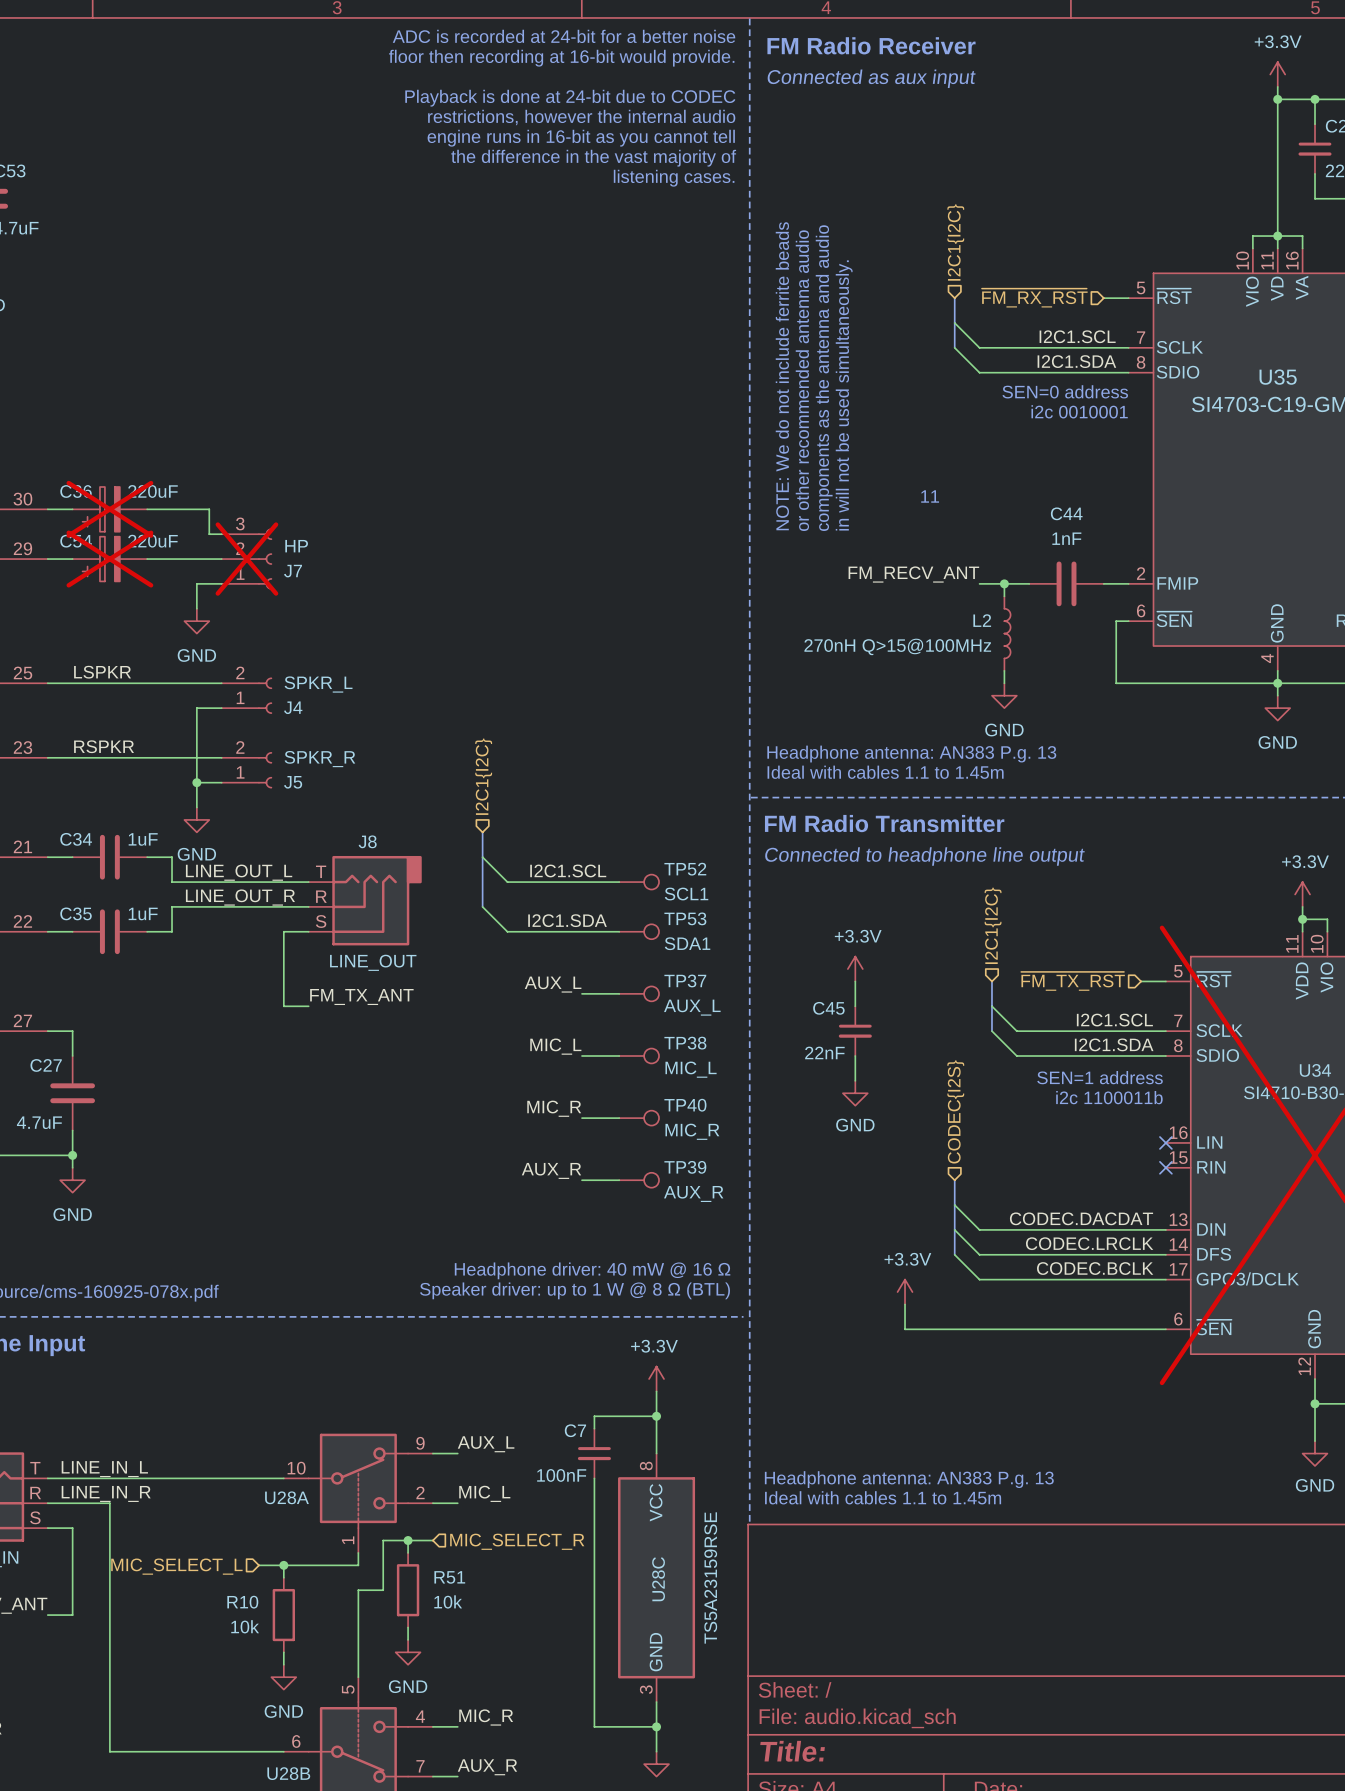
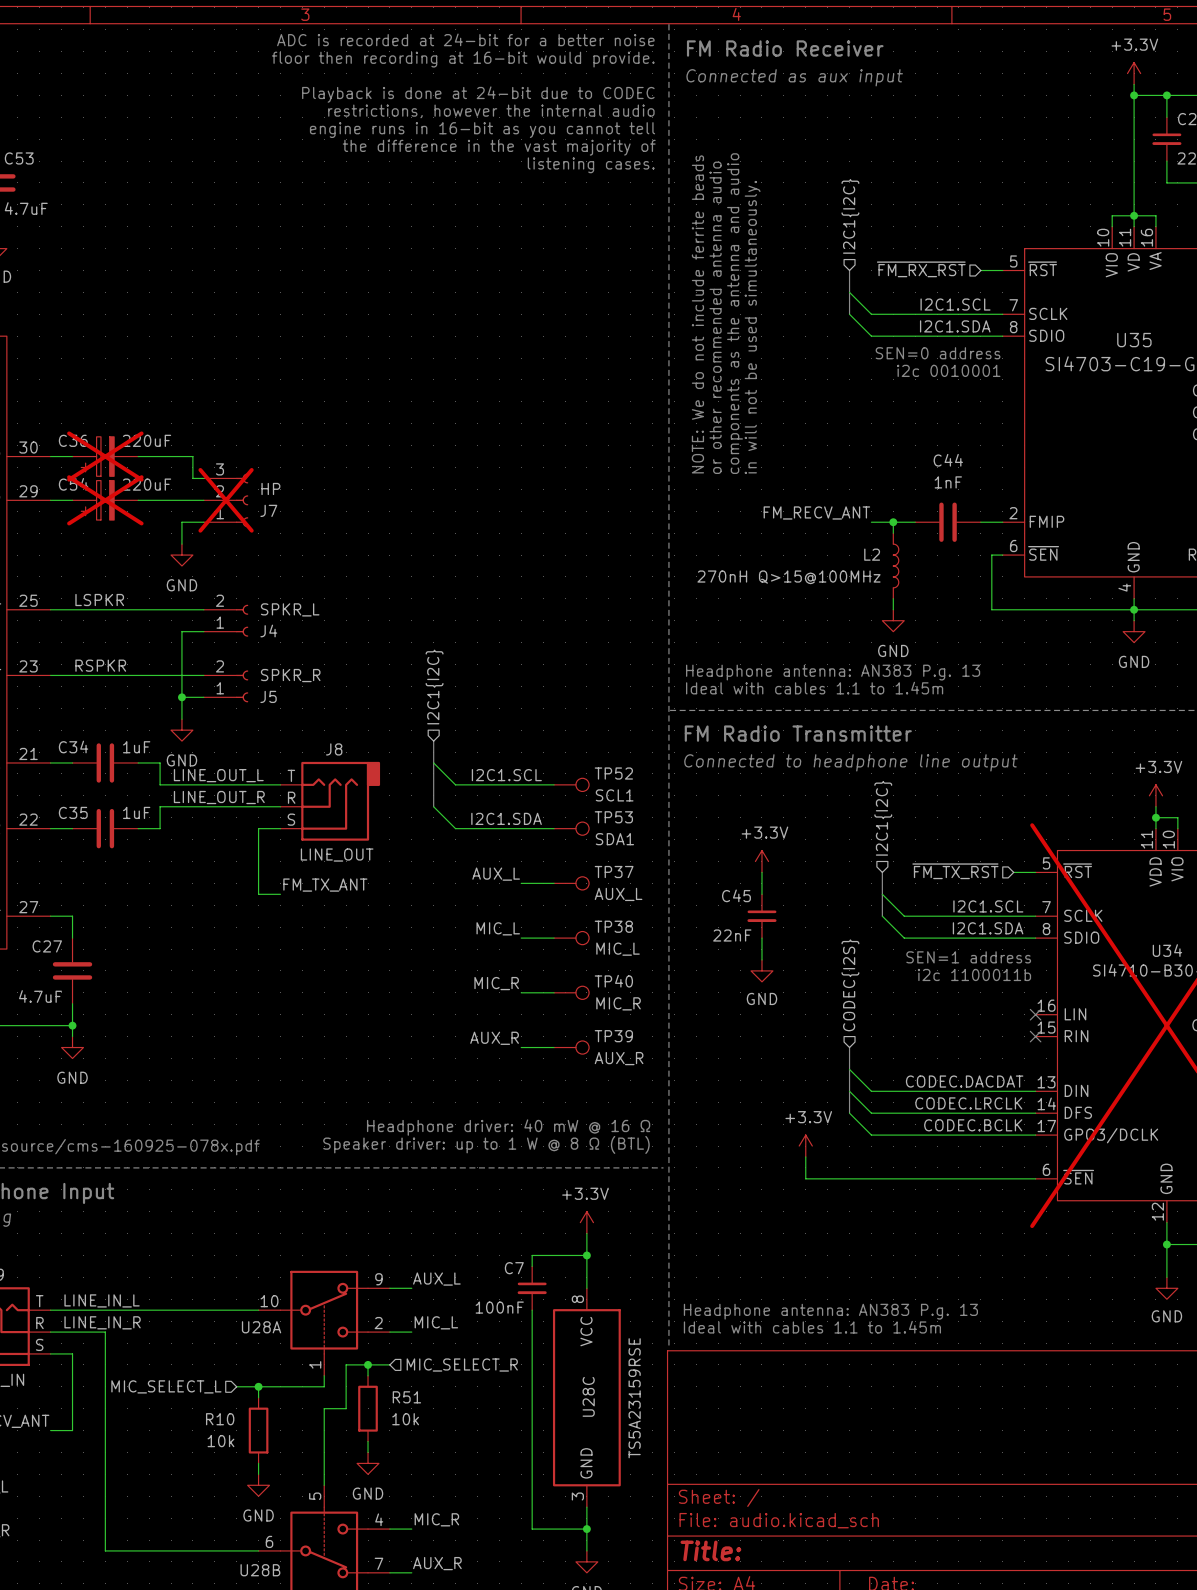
text: 11 (930, 496) -> none

